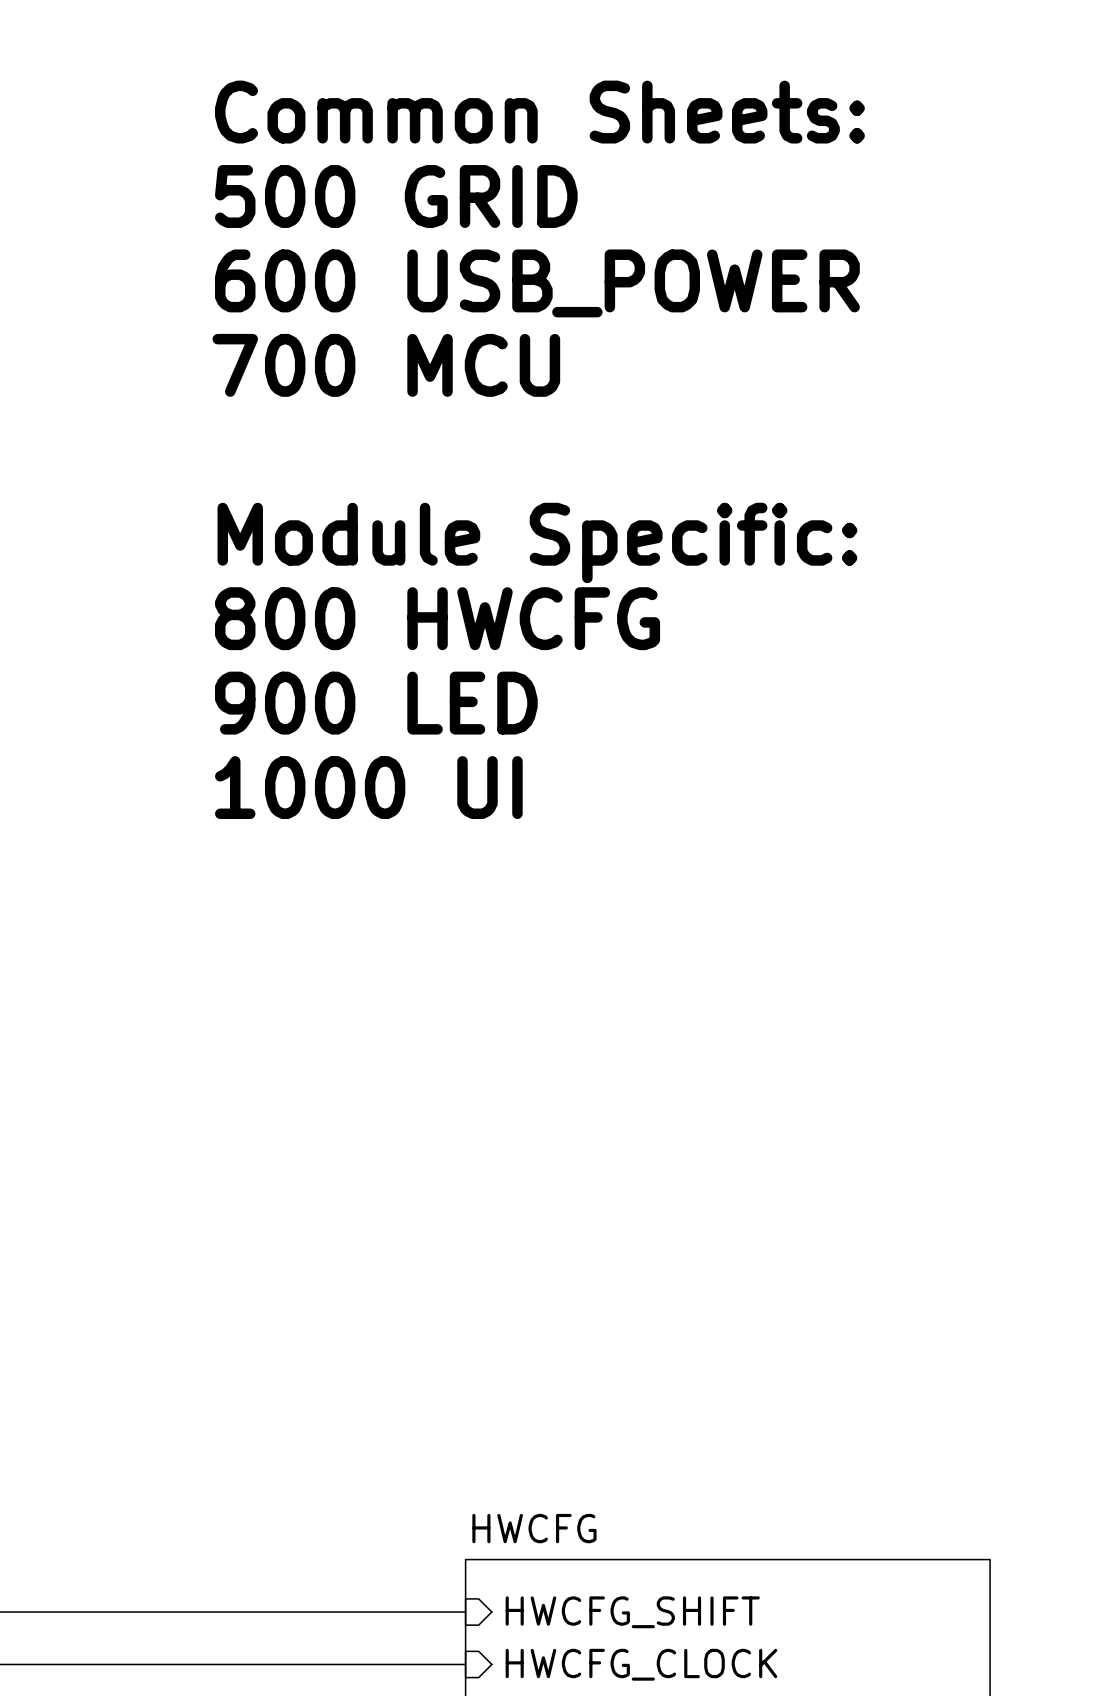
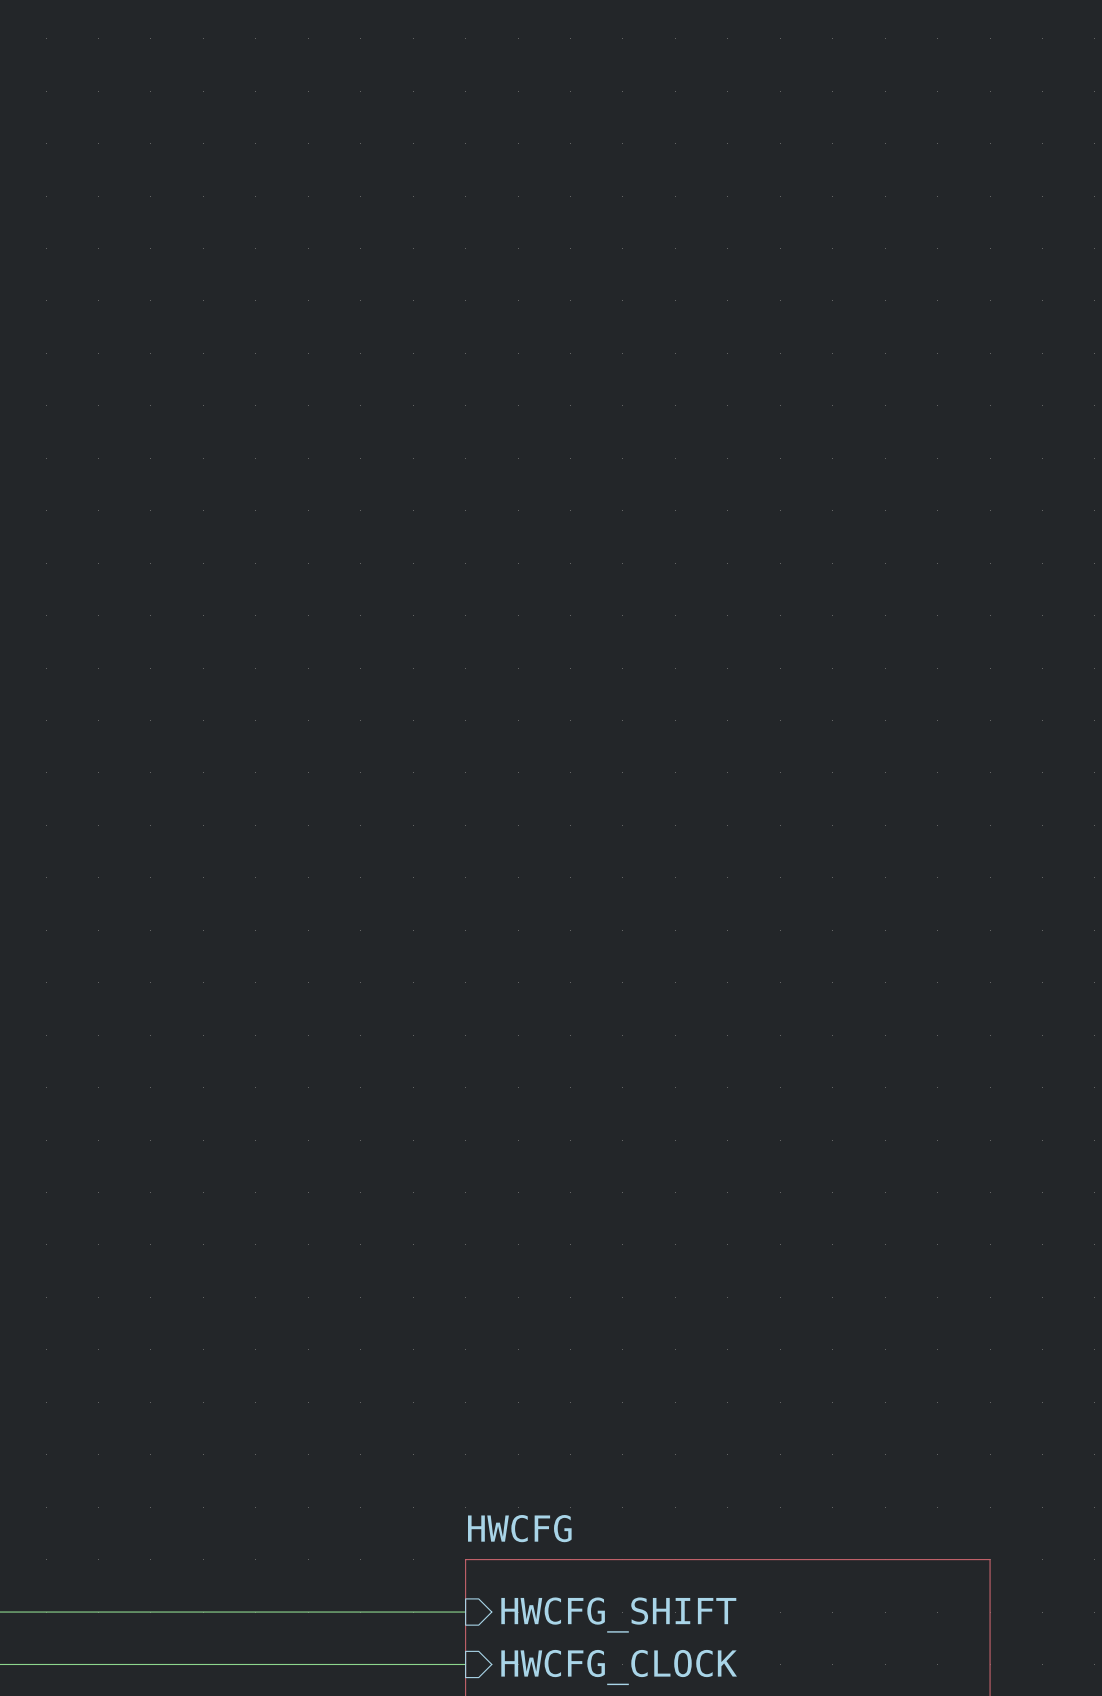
text: Common Sheets: (539, 112) -> none
text: 500 GRID (396, 196) -> none
text: 600 USB_POWER (537, 283) -> none
text: 700 MCU (386, 365) -> none
text: Module Specific: (537, 542) -> none
text: 800 HWCFG (437, 618) -> none
text: 900 LED (376, 703) -> none
text: 1000 UI (368, 787) -> none

